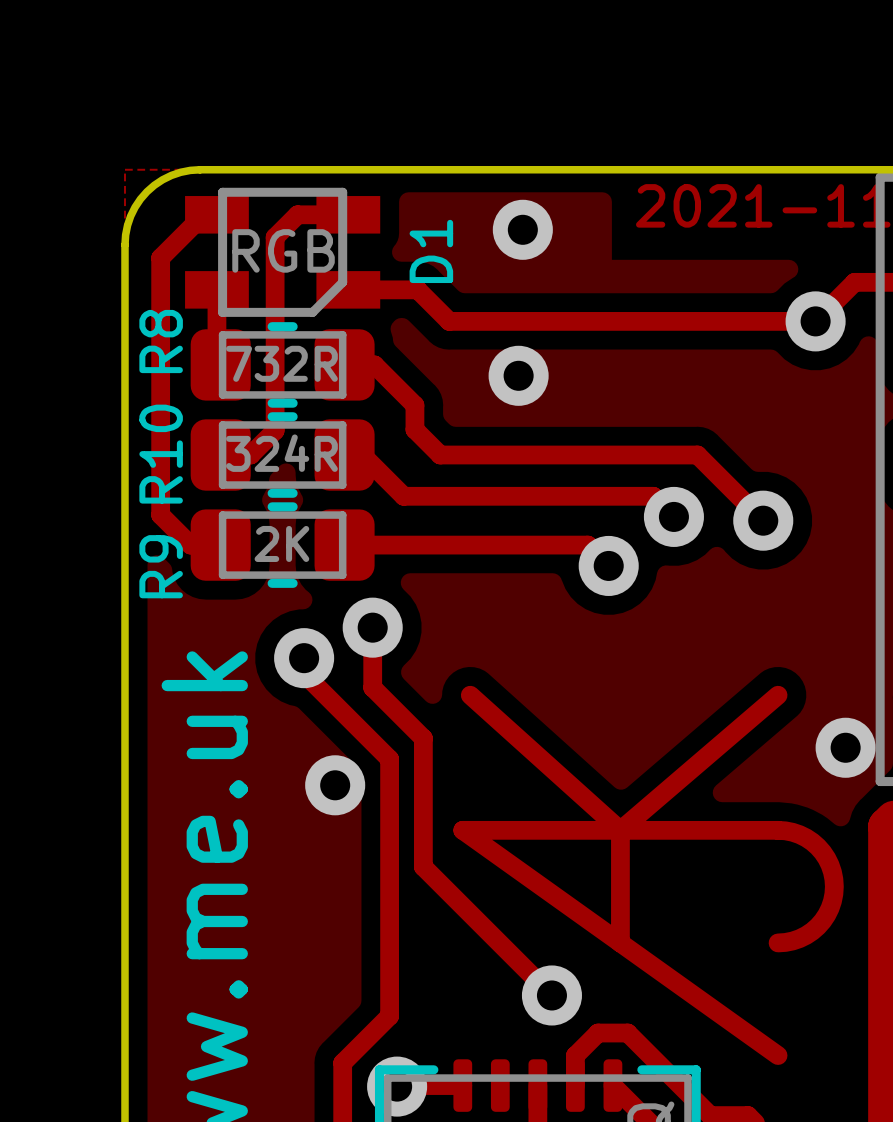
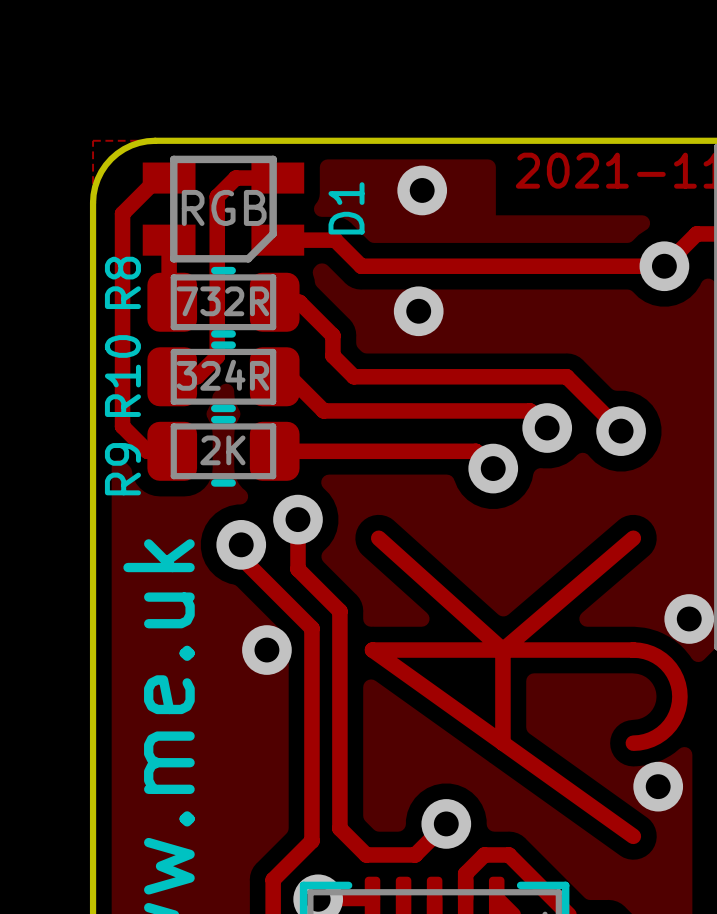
track: (423, 866) (551, 995) -> (339, 717) (339, 828) (366, 854) (415, 854) (446, 823)
drawing position: (648, 875) -> (526, 687)
via: none -> (658, 786)

